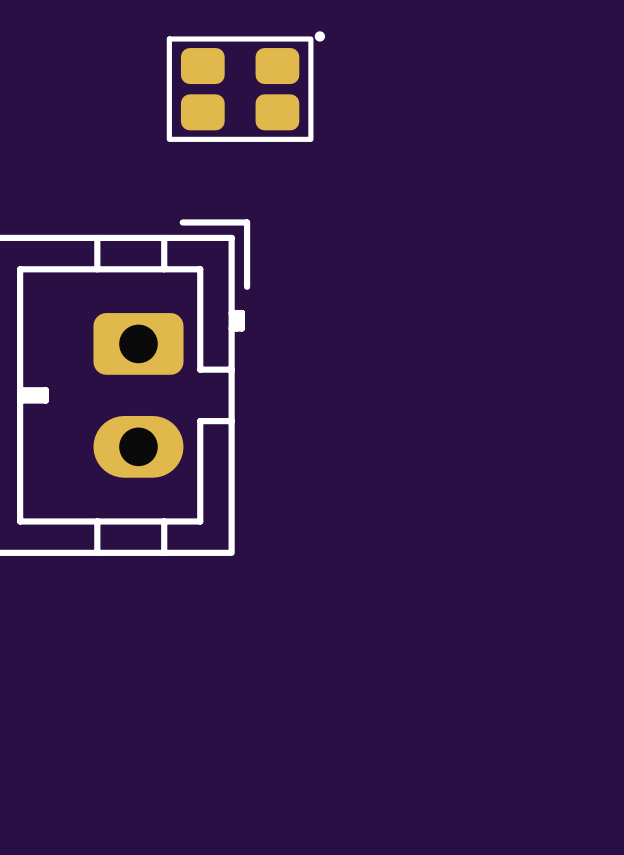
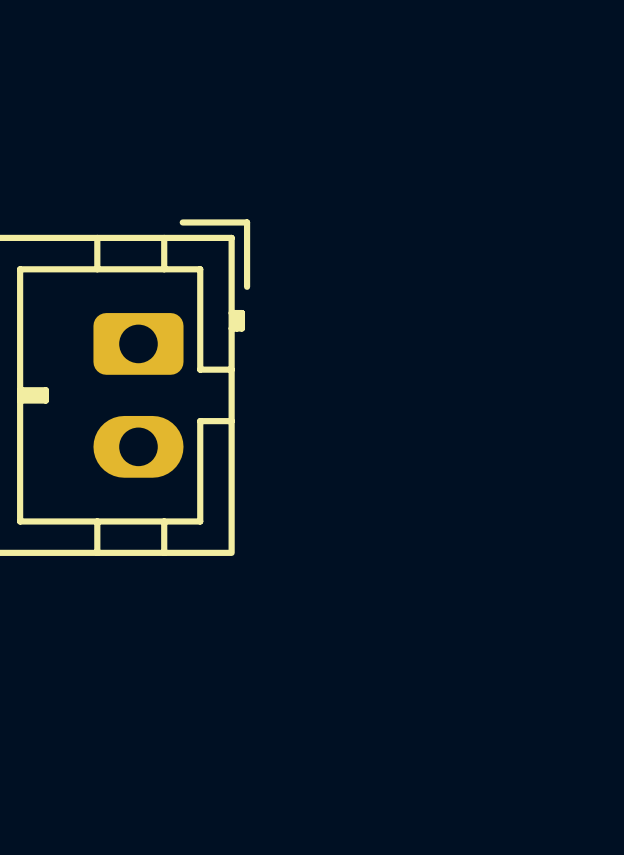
part: (245, 86) -> none

